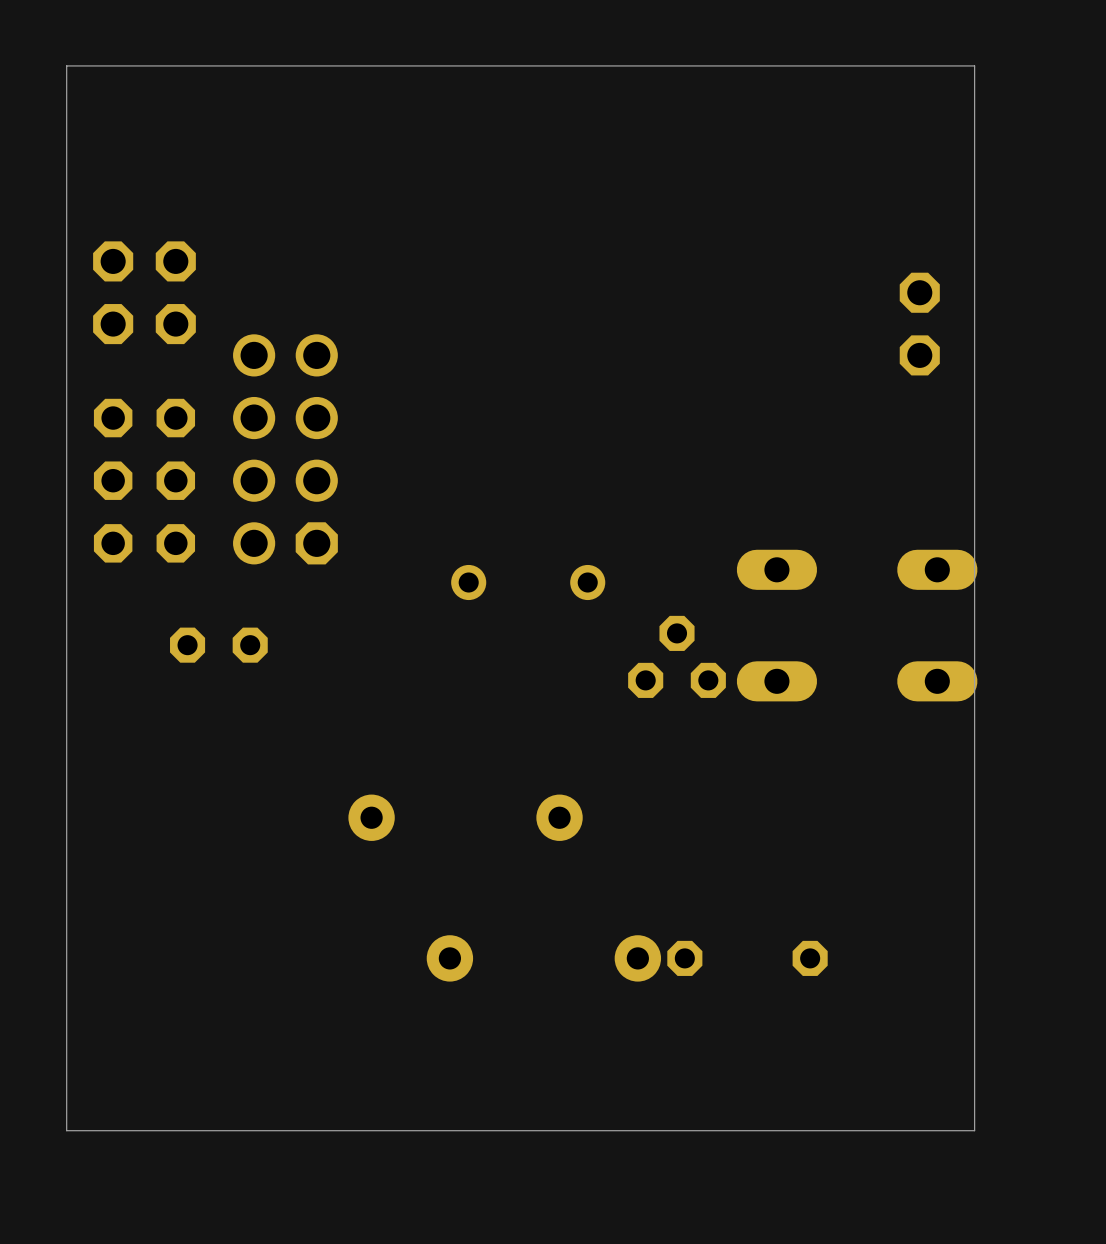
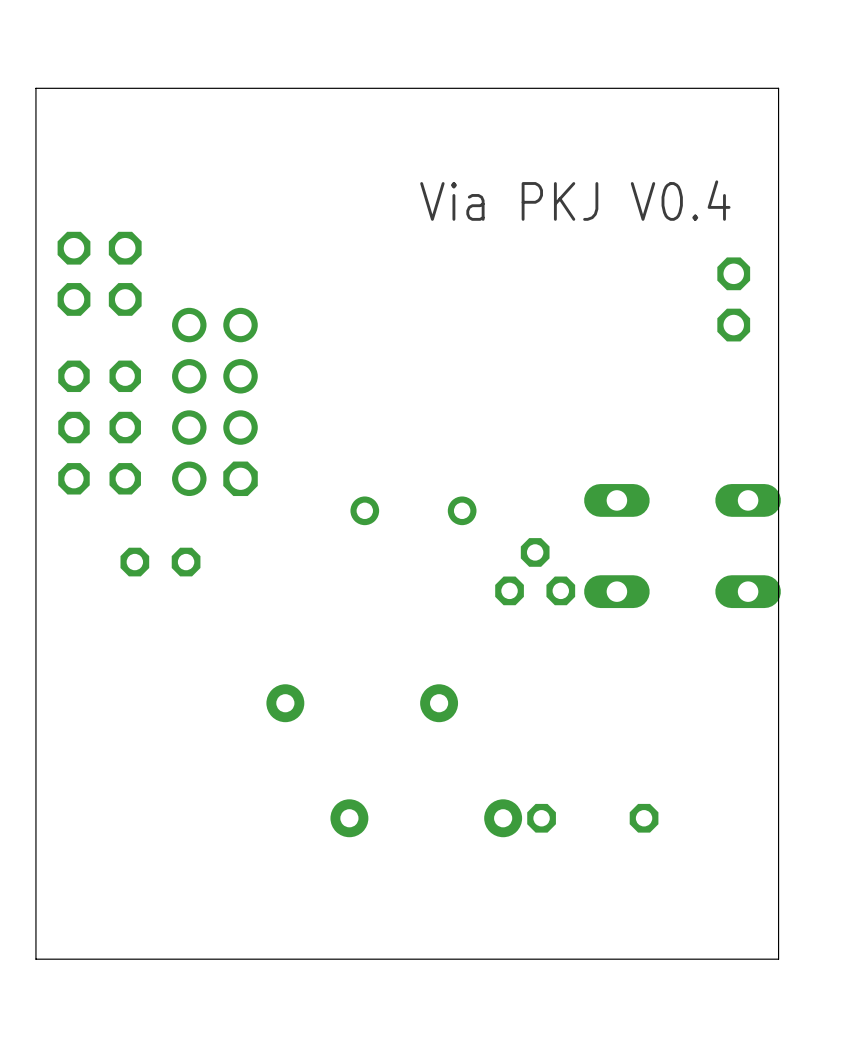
text: none -> Via PKJ V0.4 (575, 200)

